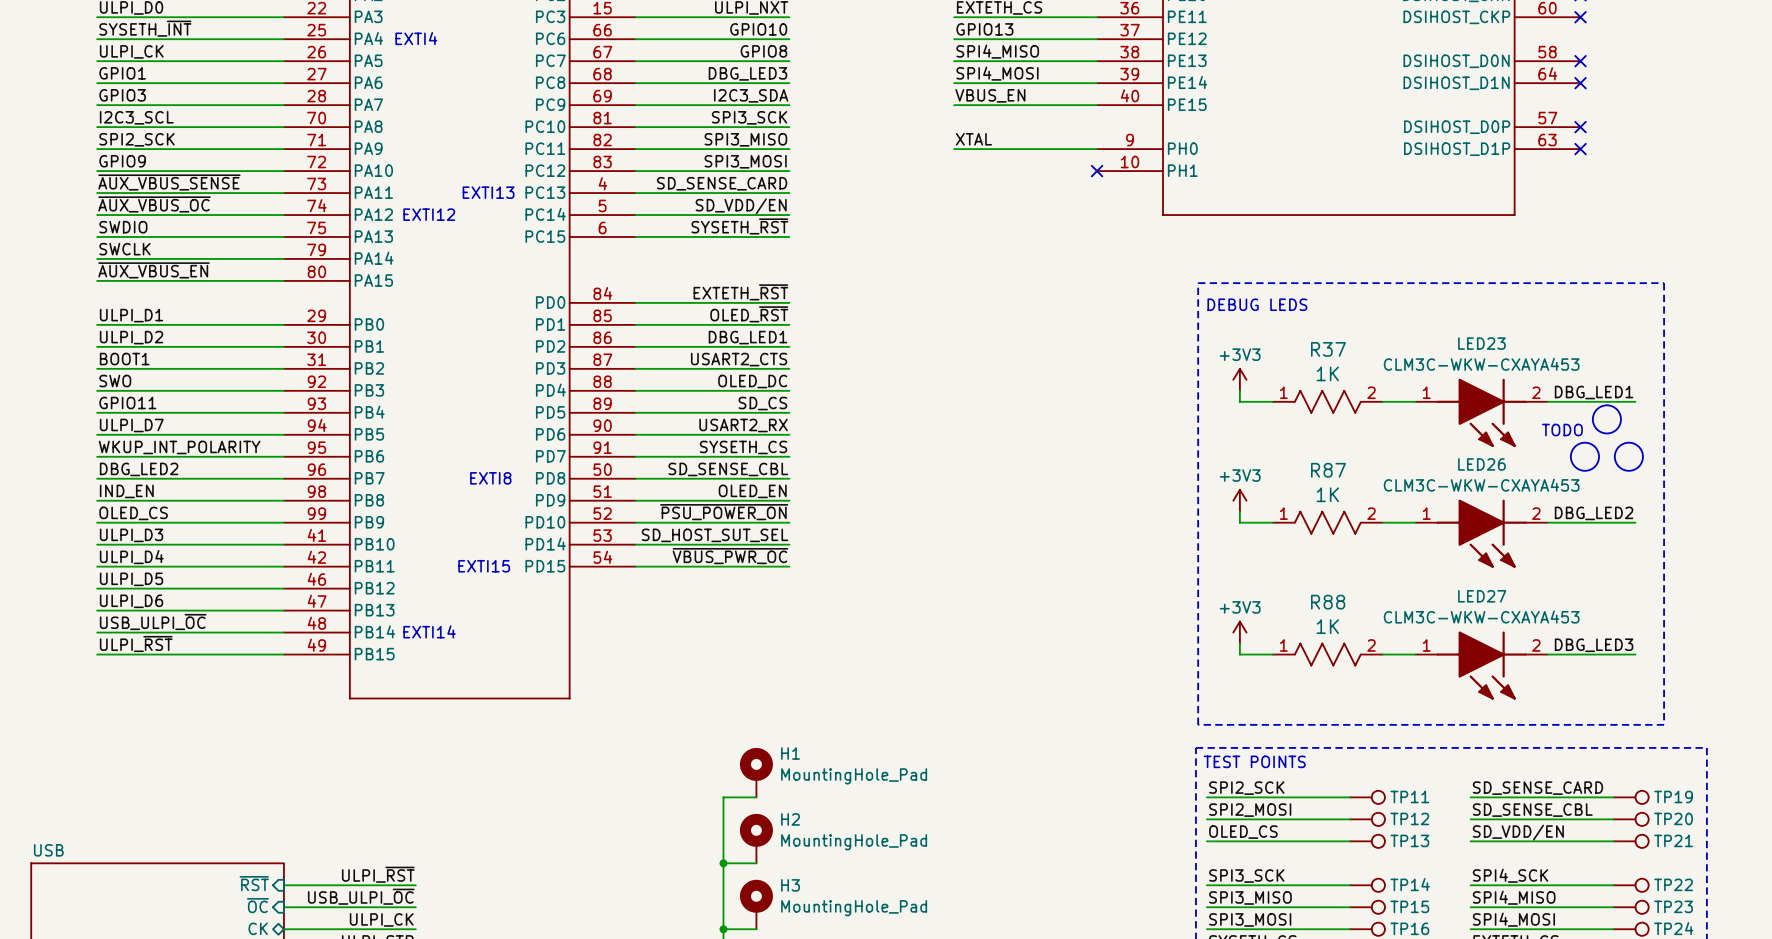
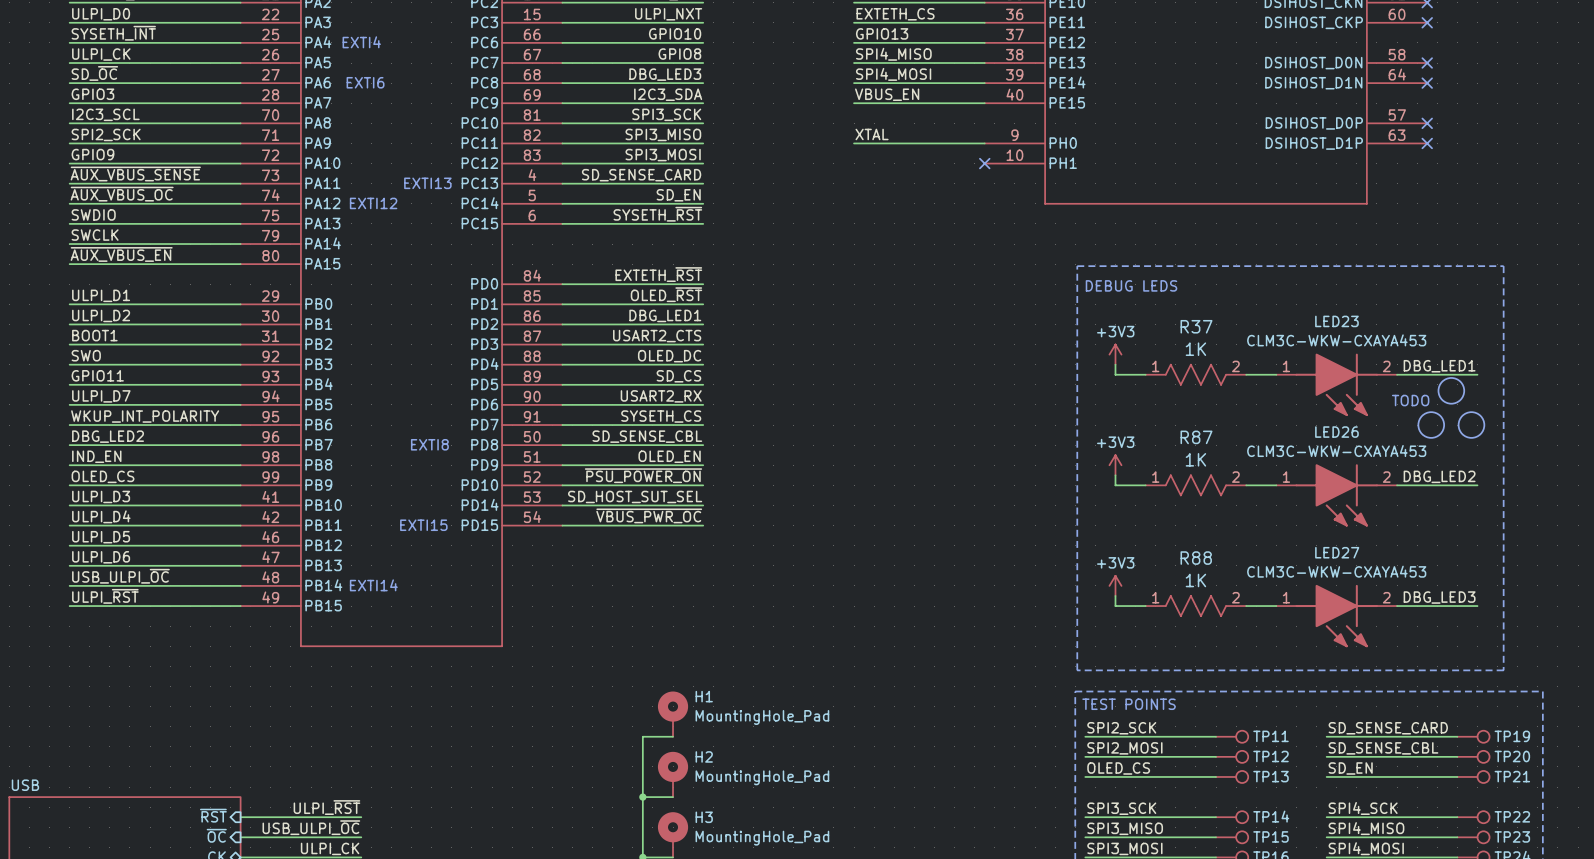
label: GPIO1 (122, 73) -> SD_~{OC} (94, 73)
text: none -> EXTI6 (365, 82)
label: SD_VDD/EN (741, 206) -> SD_EN (678, 195)
label: SD_VDD/EN (1518, 832) -> SD_EN (1350, 768)

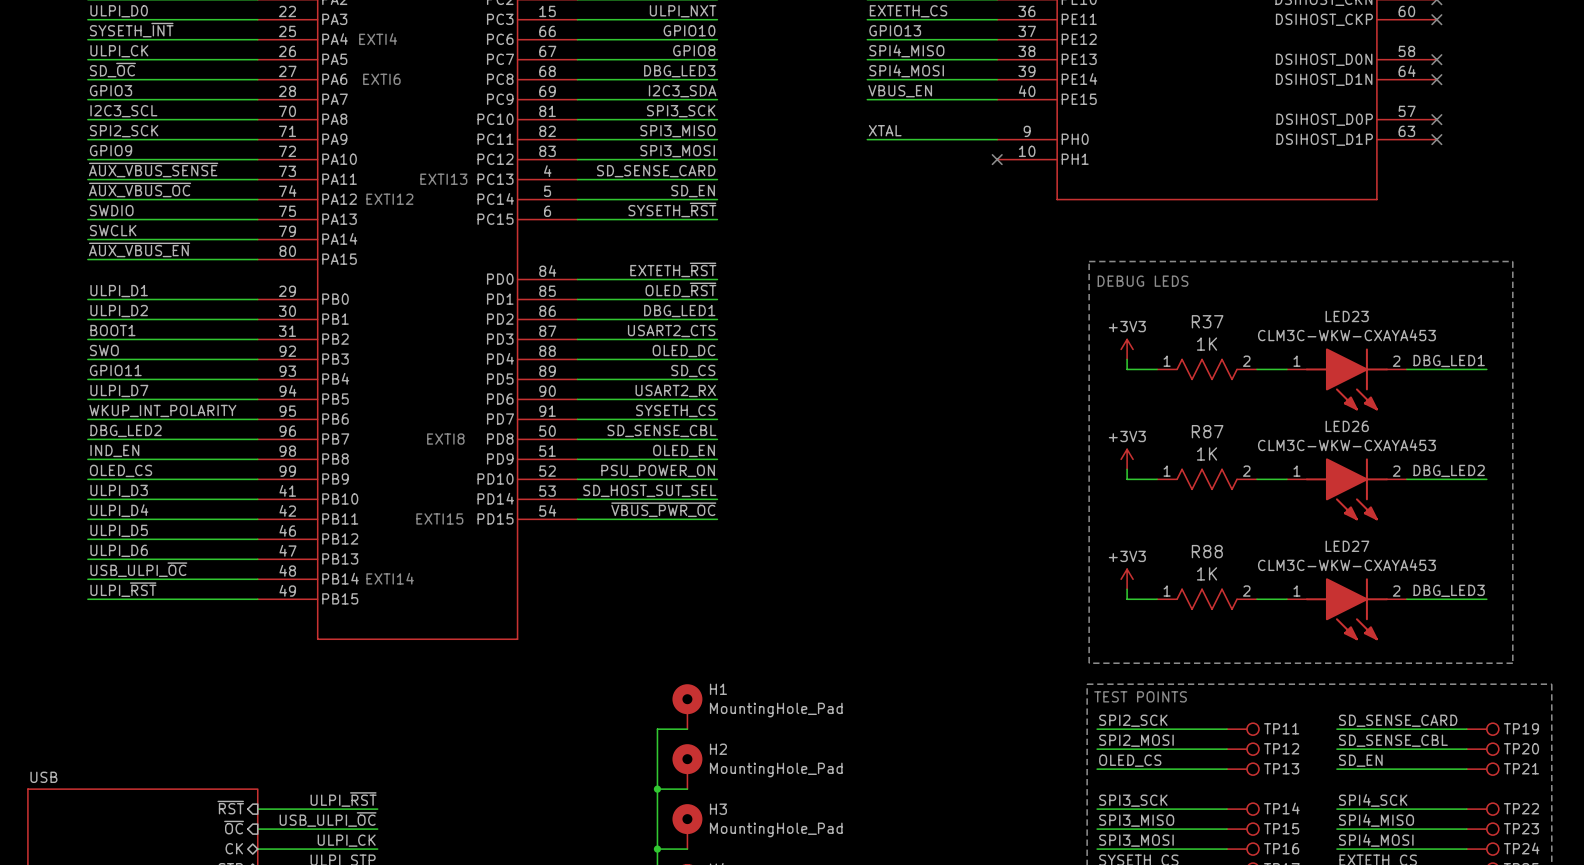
drawing: [1418, 377, 1485, 438] -> none
text: TODO (1410, 400) -> none
label: ~{PSU_POWER_ON} (643, 475) -> PSU_POWER_ON (658, 470)

